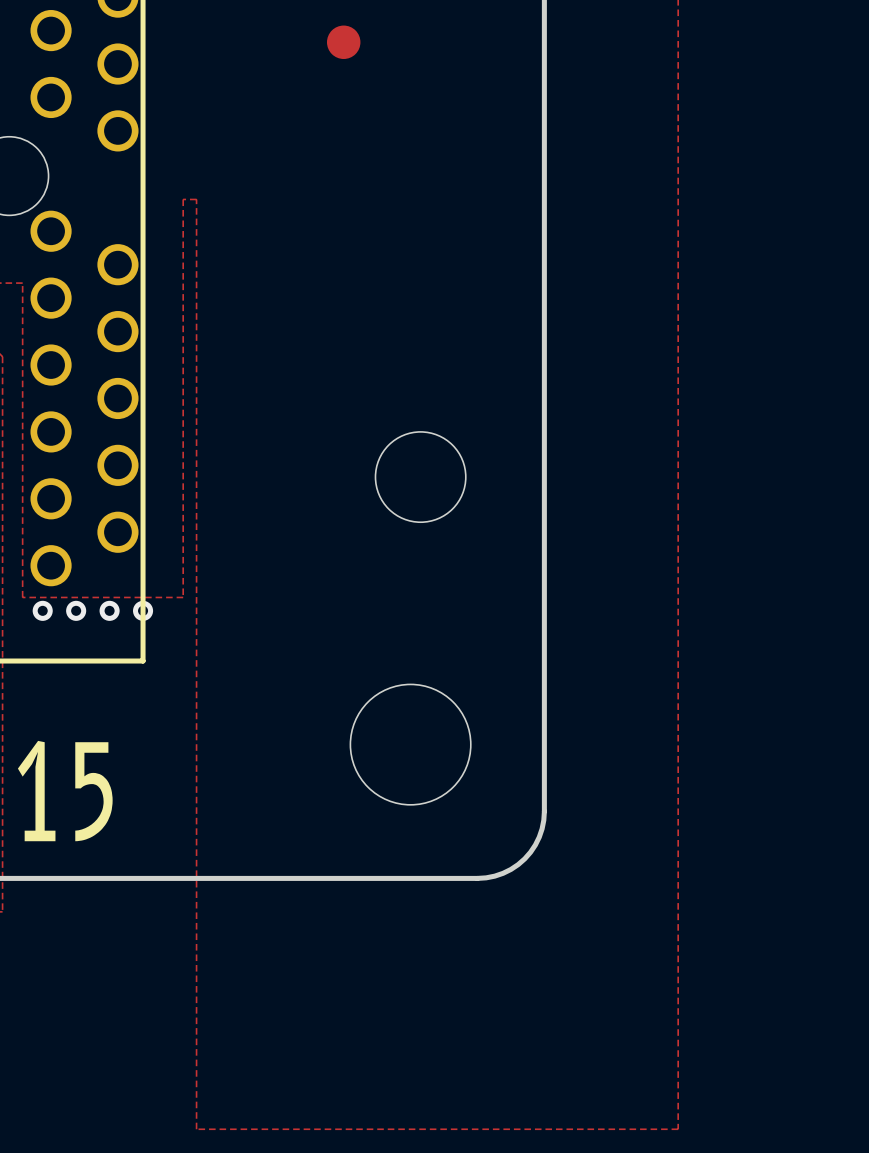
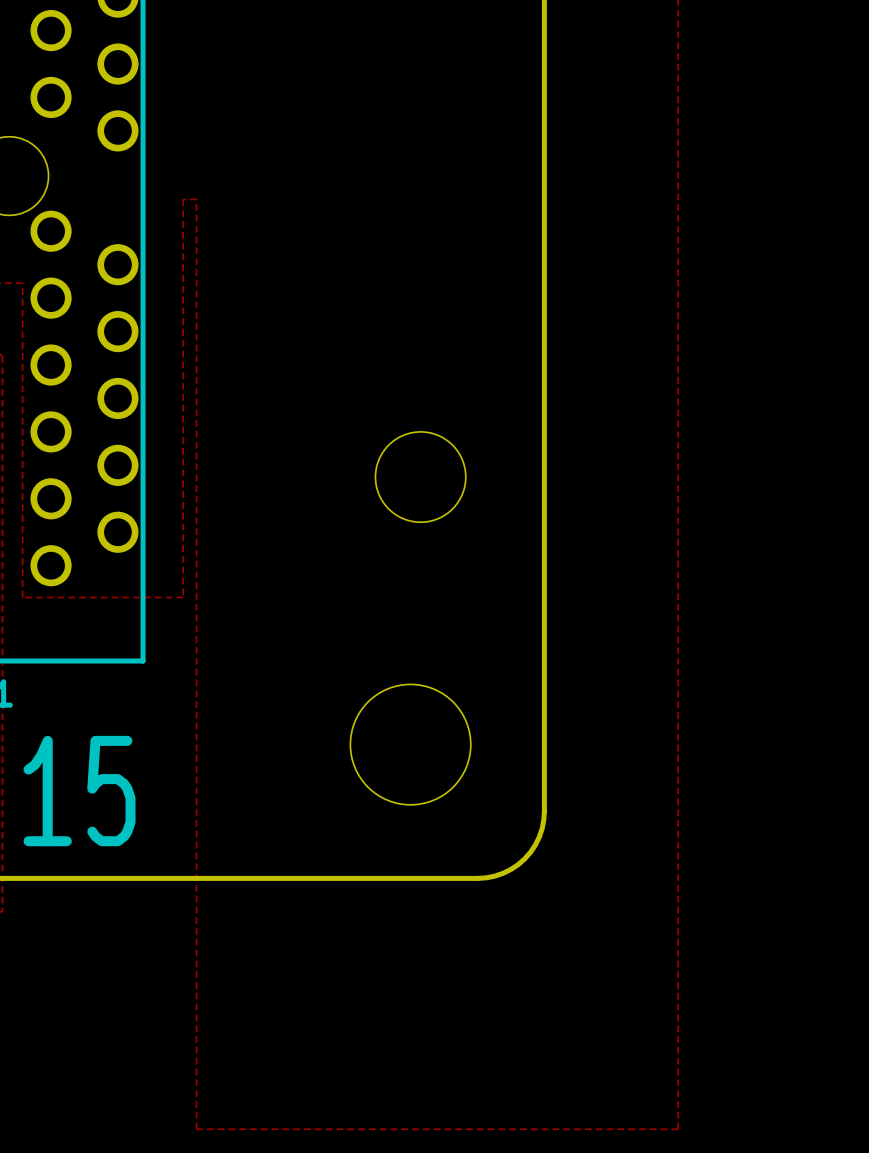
part: (343, 42) -> none
via: (42, 610) -> none
via: (76, 610) -> none
via: (109, 610) -> none
via: (143, 610) -> none

